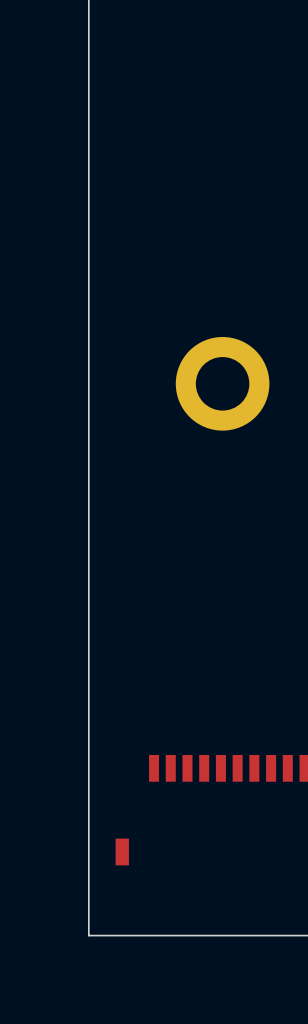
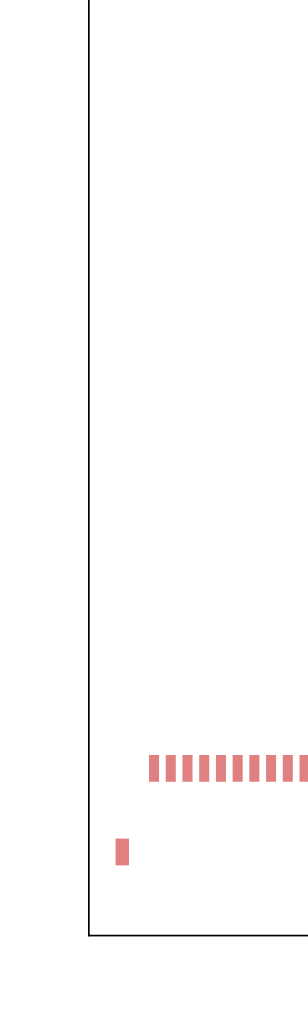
part: (222, 383) -> none

